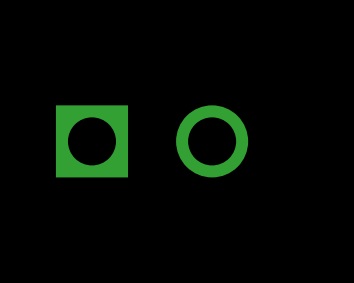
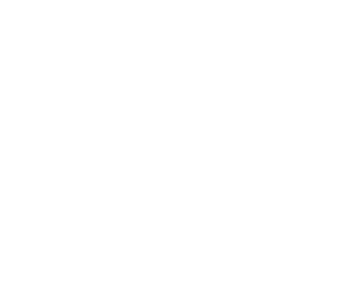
part: (152, 141) -> none

